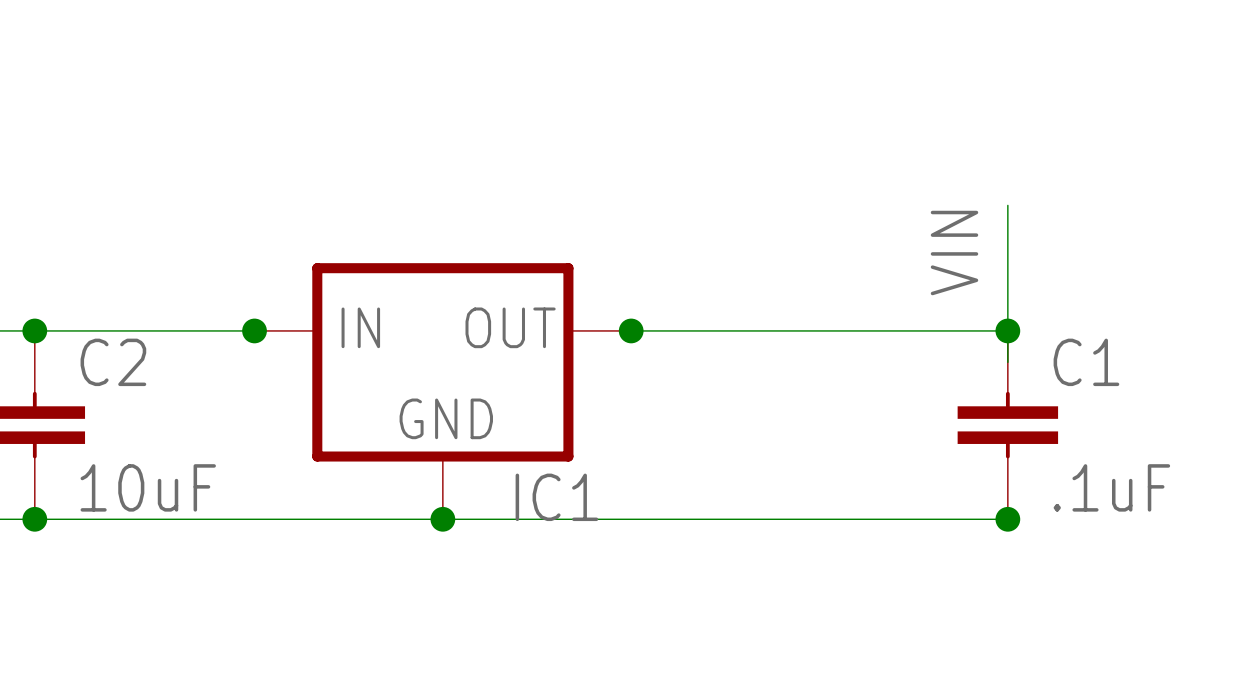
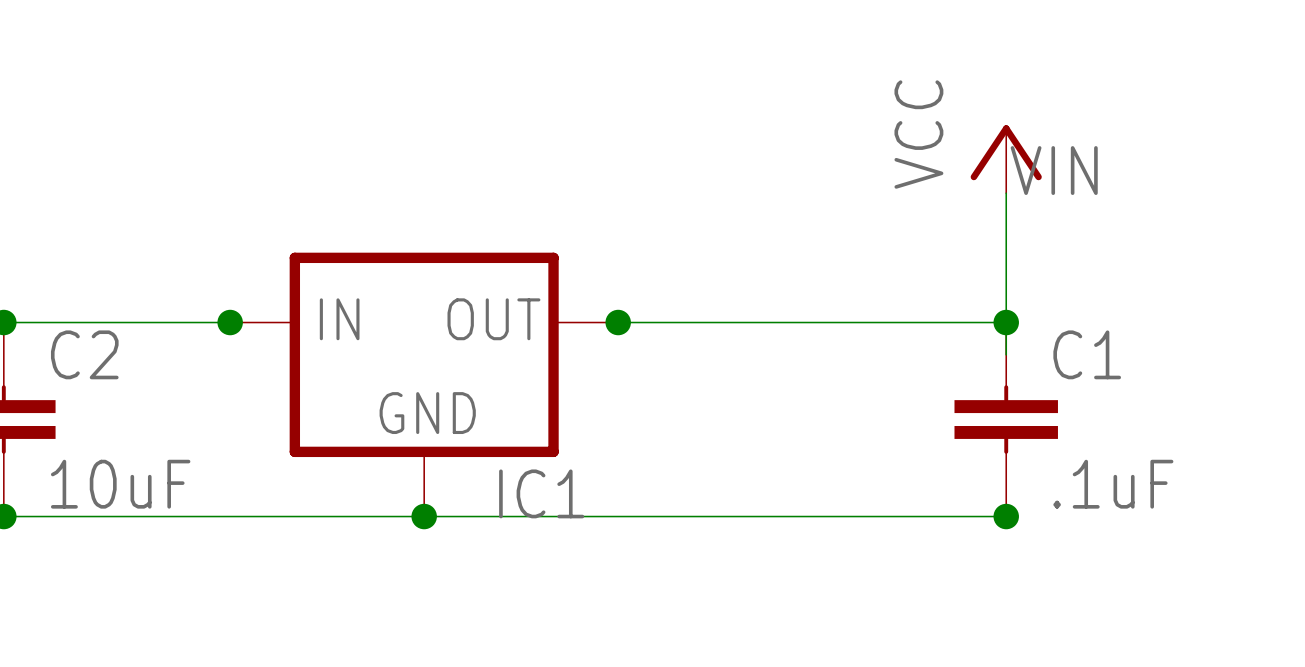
power symbol: none -> VCC (1006, 159)
label rotation: 0° (954, 253) -> 90° clockwise (1054, 170)

